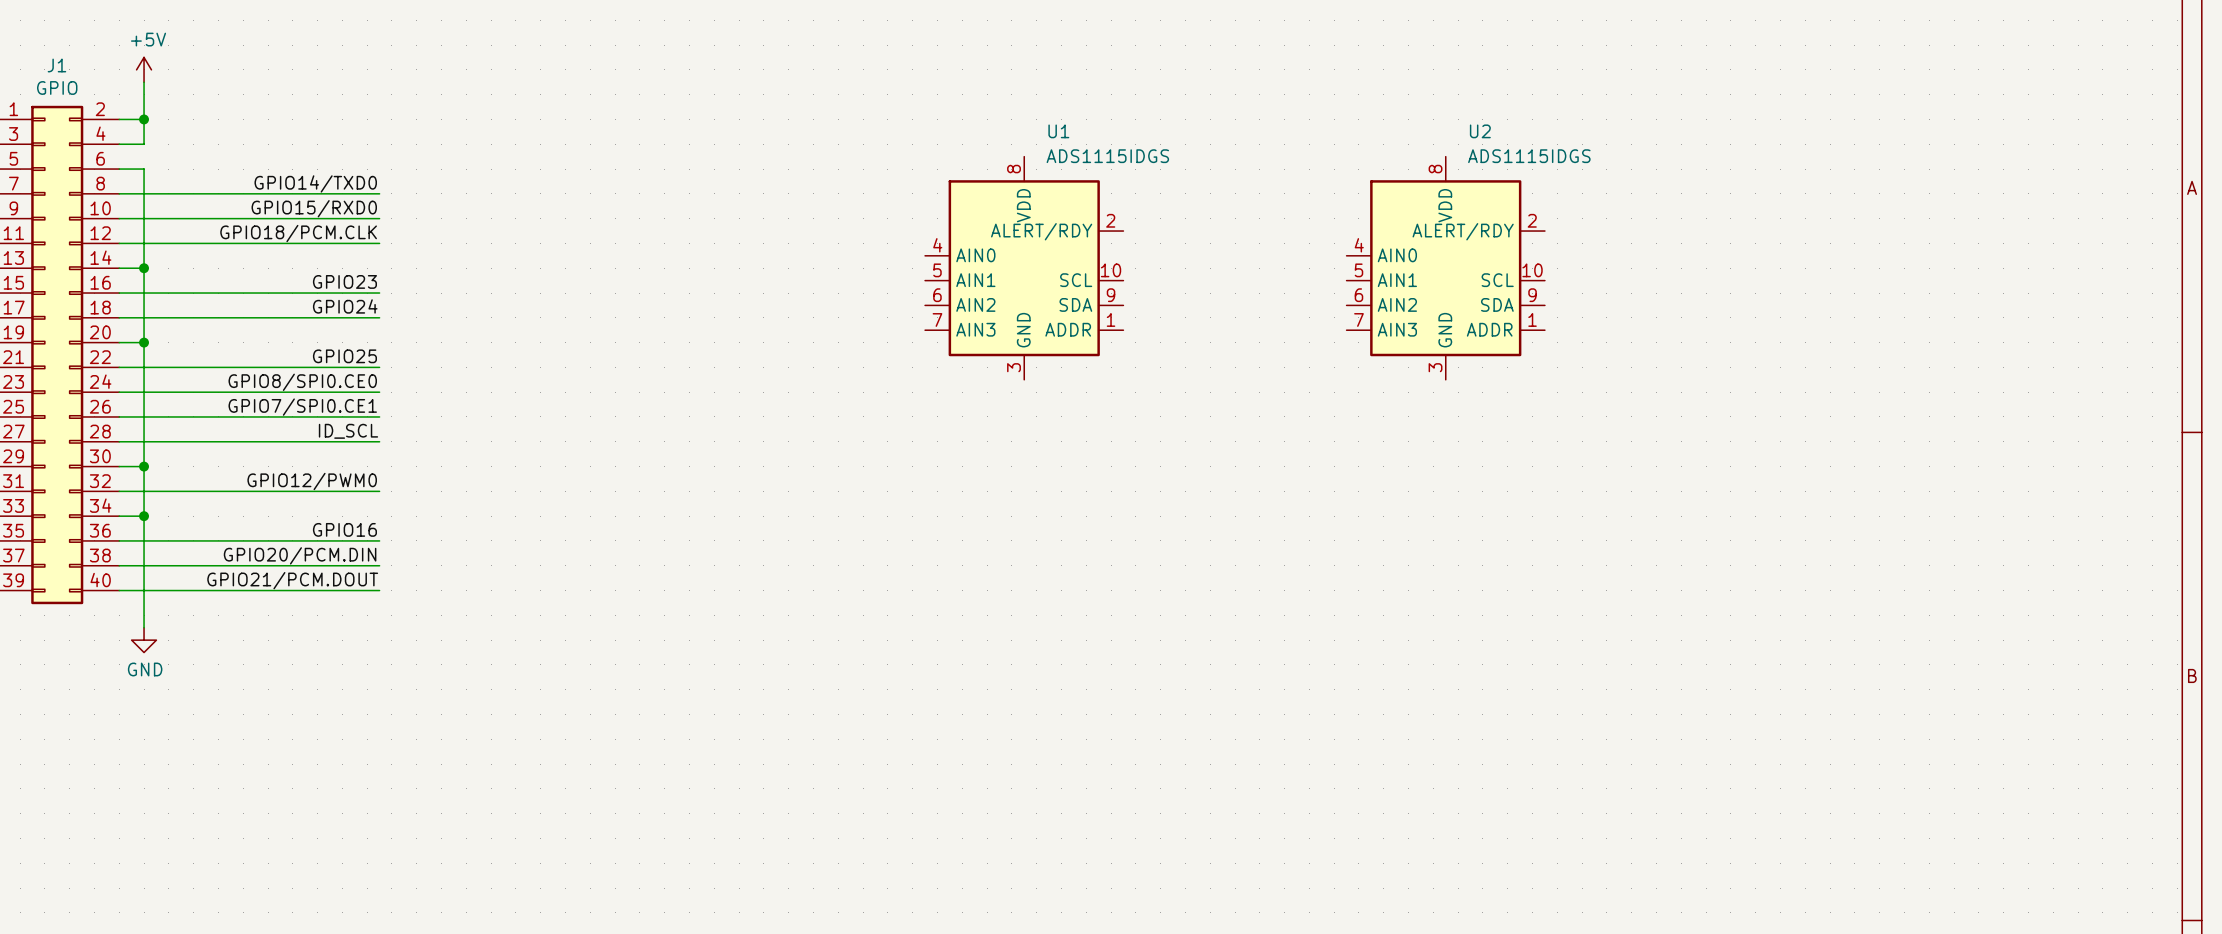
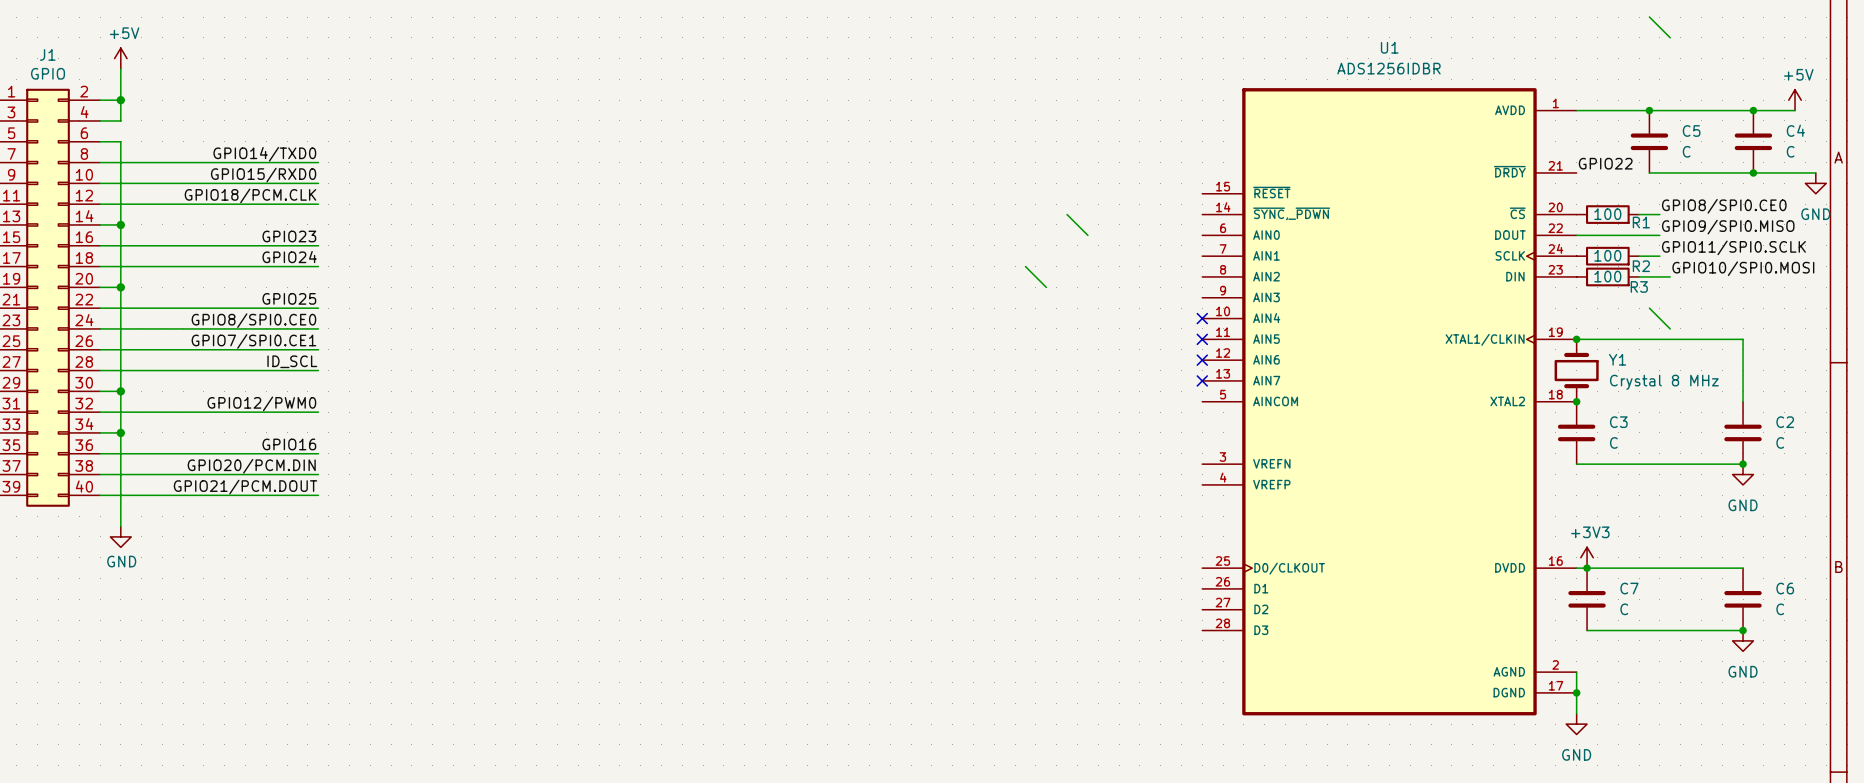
wire: none -> (1649, 17) (1670, 37)
power symbol: none -> +5V (1795, 100)
U1 name position: U1 (1058, 131) -> U1 (1389, 47)
wire: none -> (1576, 110) (1795, 110)
junction: none -> (1649, 110)
junction: none -> (1753, 110)
U1 symbol: [925, 156, 1124, 380] -> [1202, 88, 1577, 716]
U1 value: ADS1115IDGS (1107, 156) -> ADS1256IDBR (1388, 68)
C5: none -> C (1649, 141)
C4: none -> C (1753, 141)
label: none -> GPIO22 (1605, 163)
wire: none -> (1649, 172) (1815, 172)
junction: none -> (1753, 172)
power symbol: none -> GND (1815, 183)
label: none -> GPIO8/SPI0.CE0 (1724, 206)
wire: none -> (1067, 214) (1087, 235)
R1: none -> 100 (1607, 214)
wire: none -> (1639, 214) (1659, 214)
U2: ADS1115IDGS (1445, 268) -> none
label: none -> GPIO9/SPI0.MISO (1728, 227)
wire: none -> (1576, 235) (1659, 235)
label: none -> GPIO11/SPI0.SCLK (1733, 247)
R2: none -> 100 (1607, 256)
wire: none -> (1639, 256) (1659, 256)
wire: none -> (1025, 266) (1046, 287)
label: none -> GPIO10/SPI0.MOSI (1743, 268)
R3: none -> 100 (1607, 276)
wire: none -> (1639, 276) (1670, 276)
wire: none -> (1649, 308) (1670, 328)
no-connect mark: none -> (1202, 318)
no-connect mark: none -> (1202, 339)
wire: none -> (1576, 339) (1743, 339) (1743, 401)
junction: none -> (1576, 339)
no-connect mark: none -> (1202, 360)
Y1: none -> Crystal 8 MHz (1576, 370)
no-connect mark: none -> (1202, 380)
junction: none -> (1576, 401)
C3: none -> C (1576, 432)
C2: none -> C (1743, 432)
wire: none -> (1576, 464) (1743, 464)
junction: none -> (1743, 464)
power symbol: none -> GND (1743, 474)
power symbol: none -> +3V3 (1587, 557)
wire: none -> (1576, 568) (1743, 568)
junction: none -> (1587, 568)
C7: none -> C (1587, 599)
C6: none -> C (1743, 599)
wire: none -> (1587, 630) (1743, 630)
junction: none -> (1743, 630)
power symbol: none -> GND (1743, 640)
wire: none -> (1576, 672) (1576, 713)
junction: none -> (1576, 692)
power symbol: none -> GND (1576, 724)

